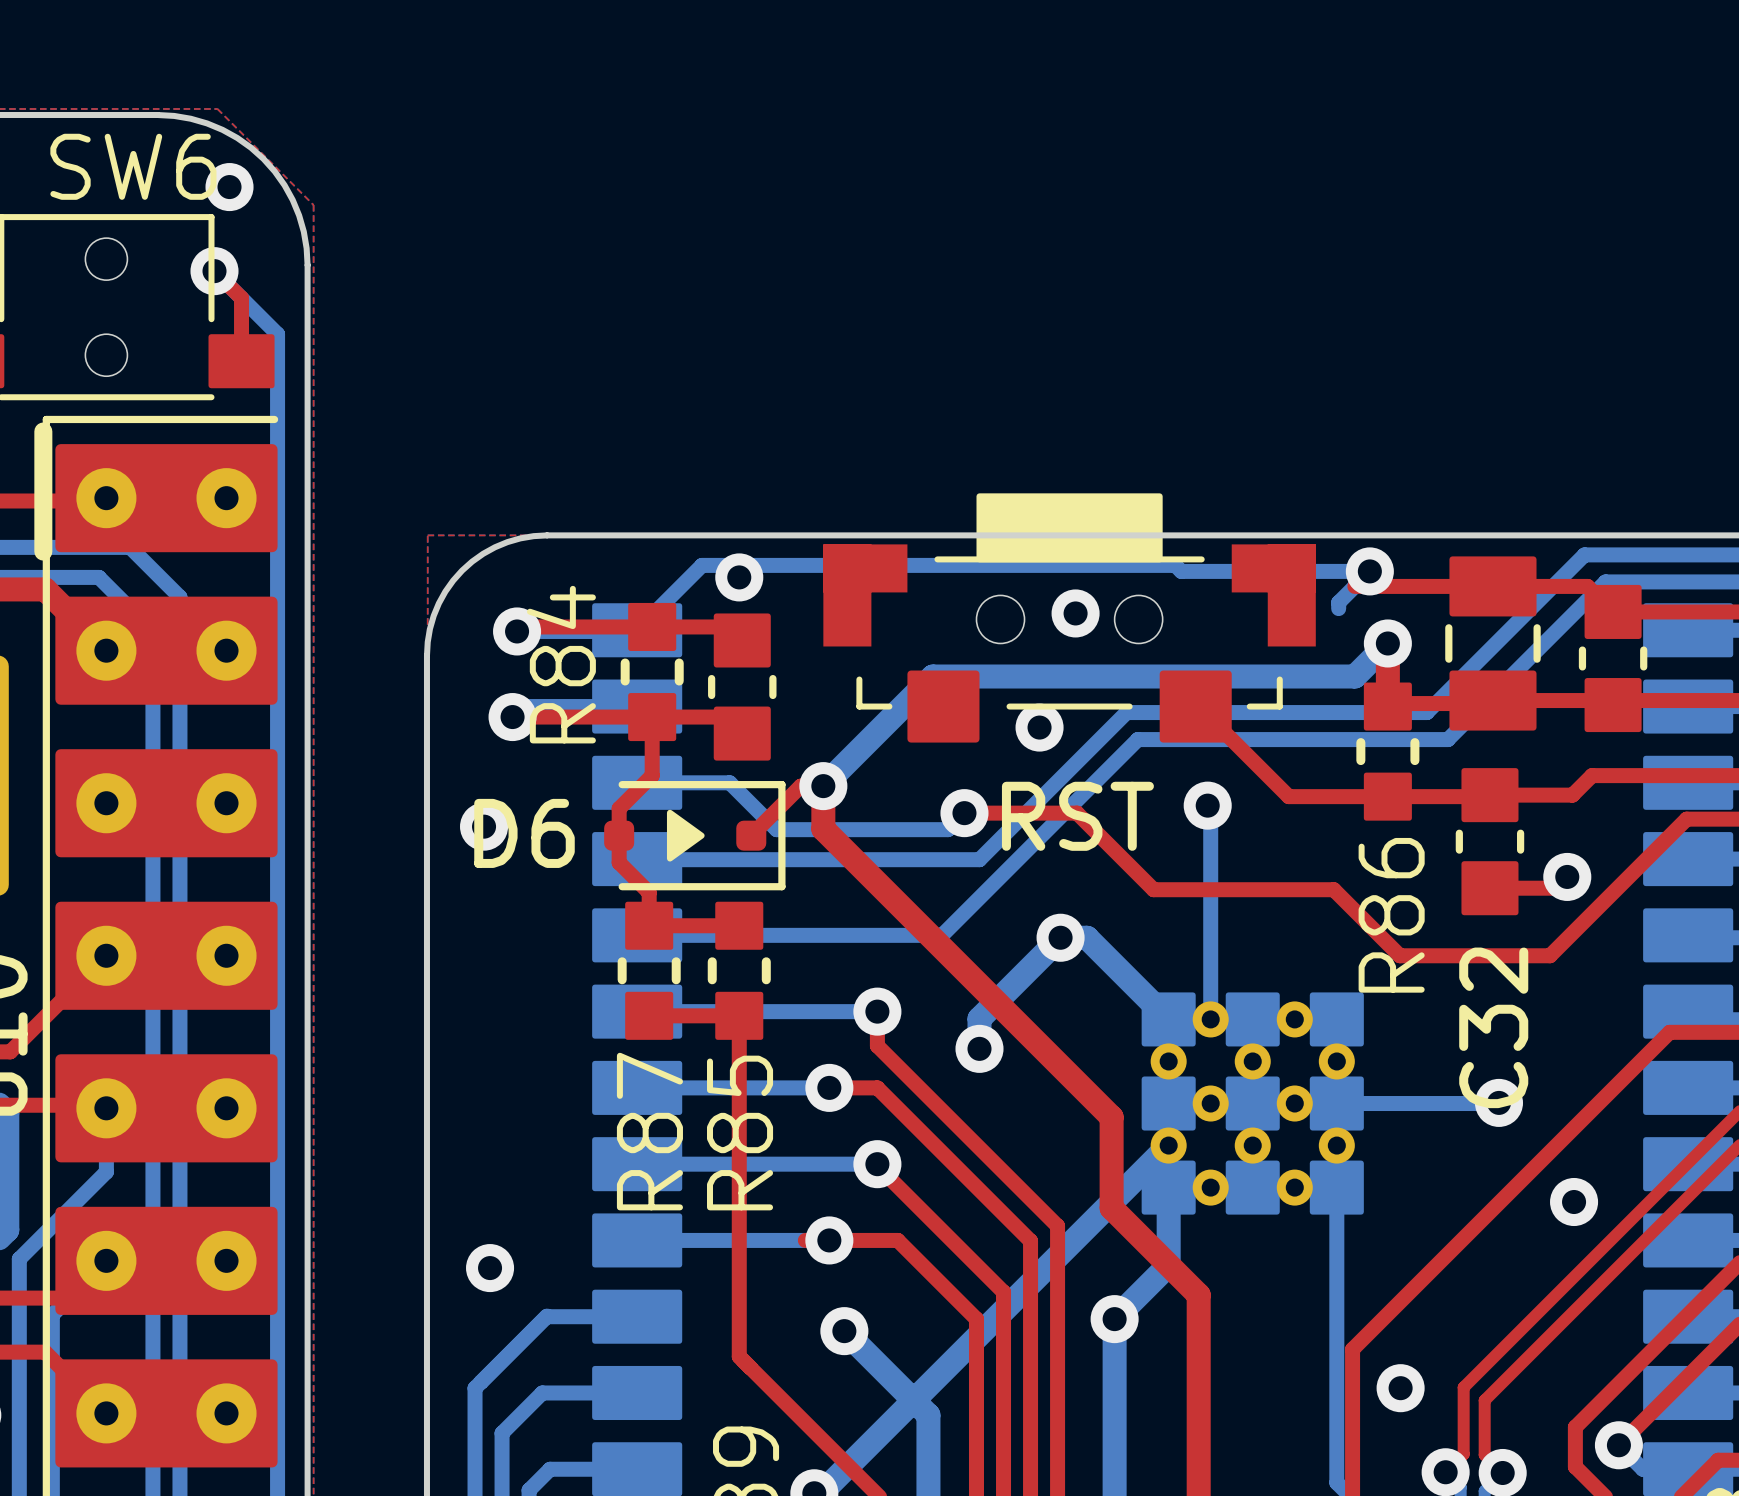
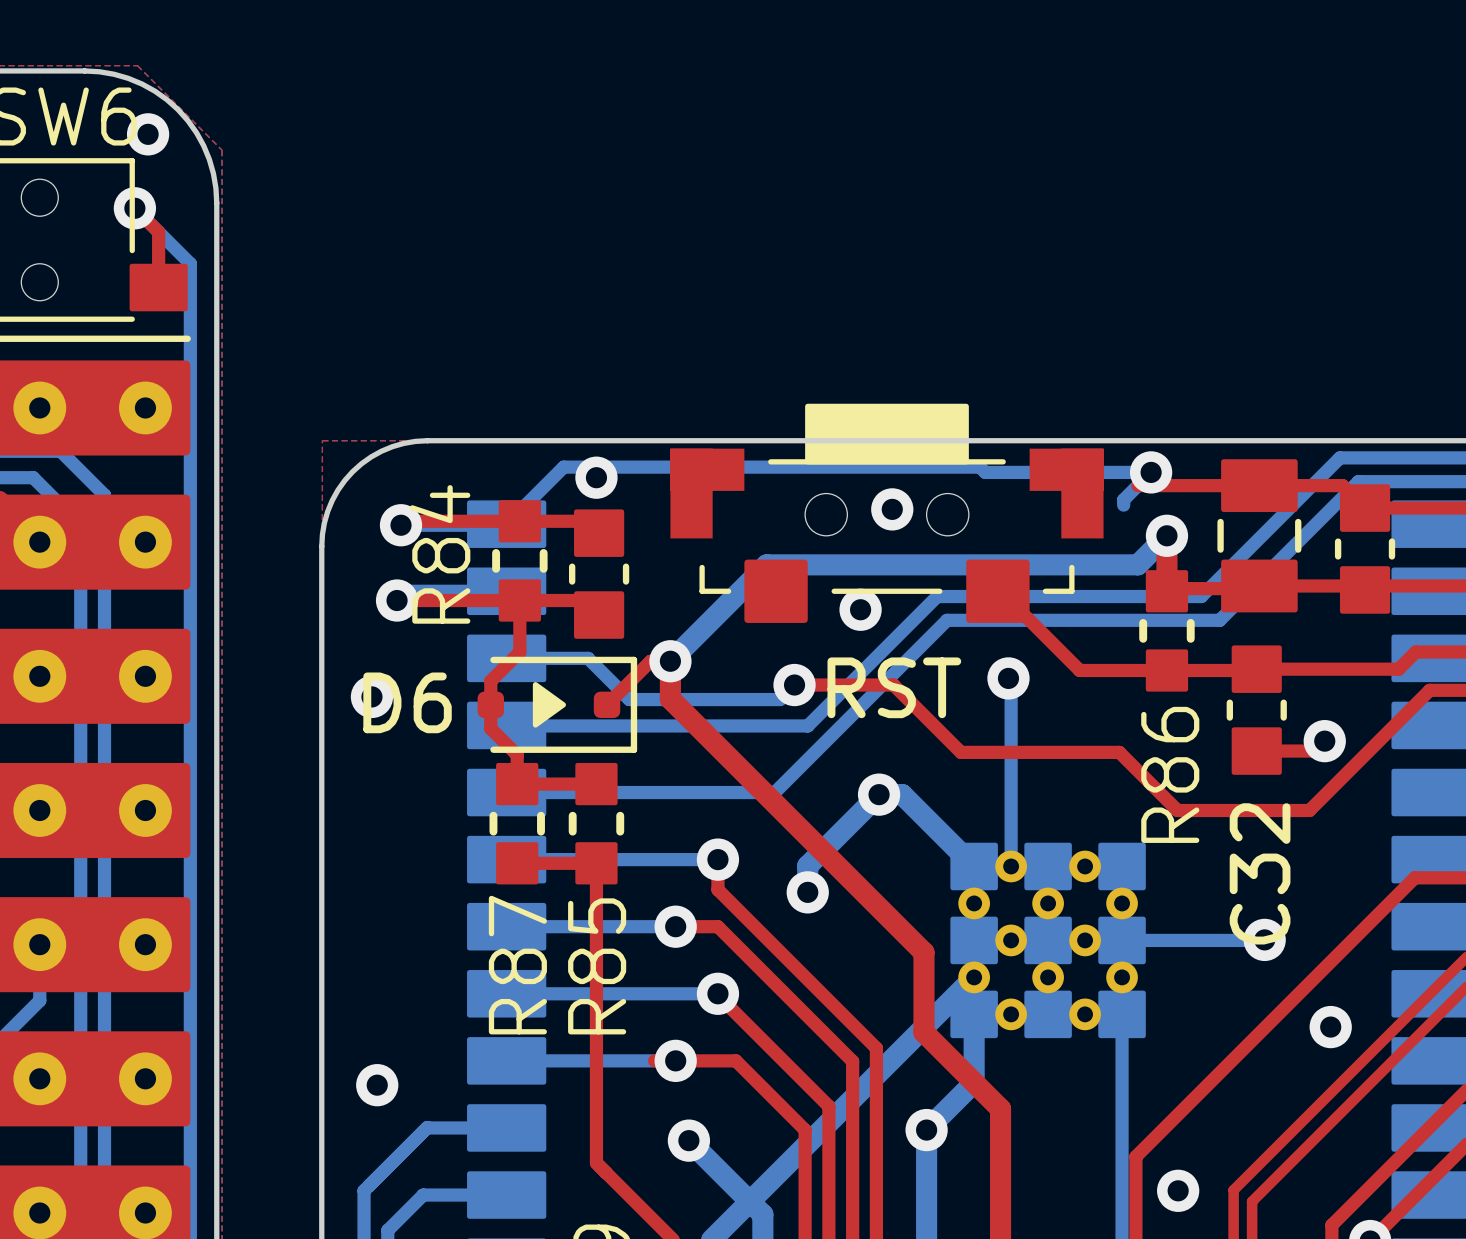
top track: (1670, 775) (1592, 775) (1572, 795) -> (1415, 652) (1398, 669) (1329, 669)

